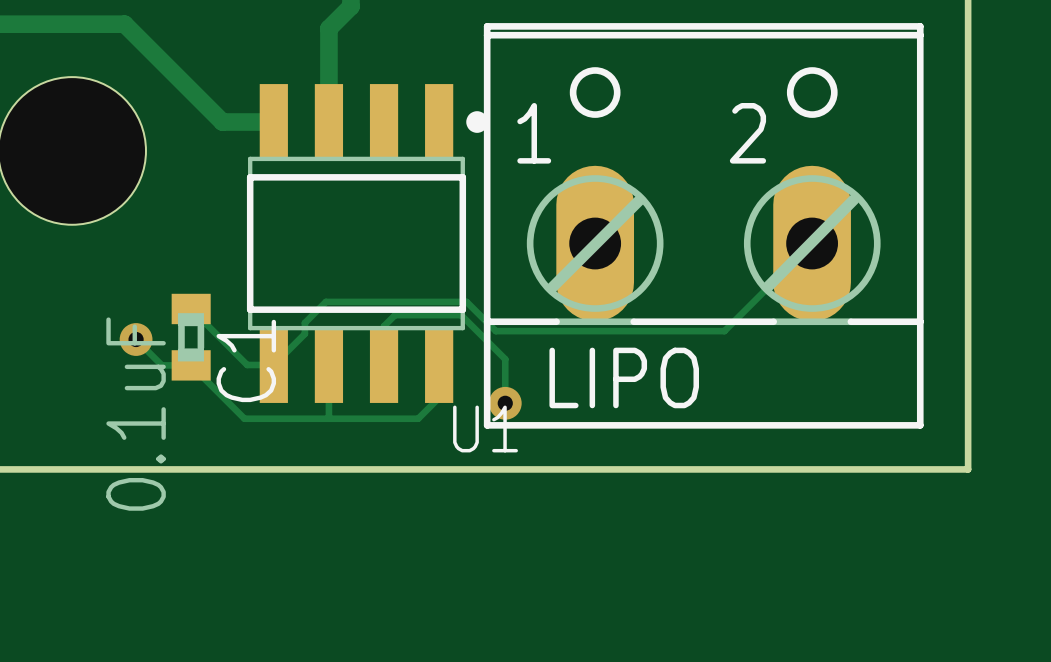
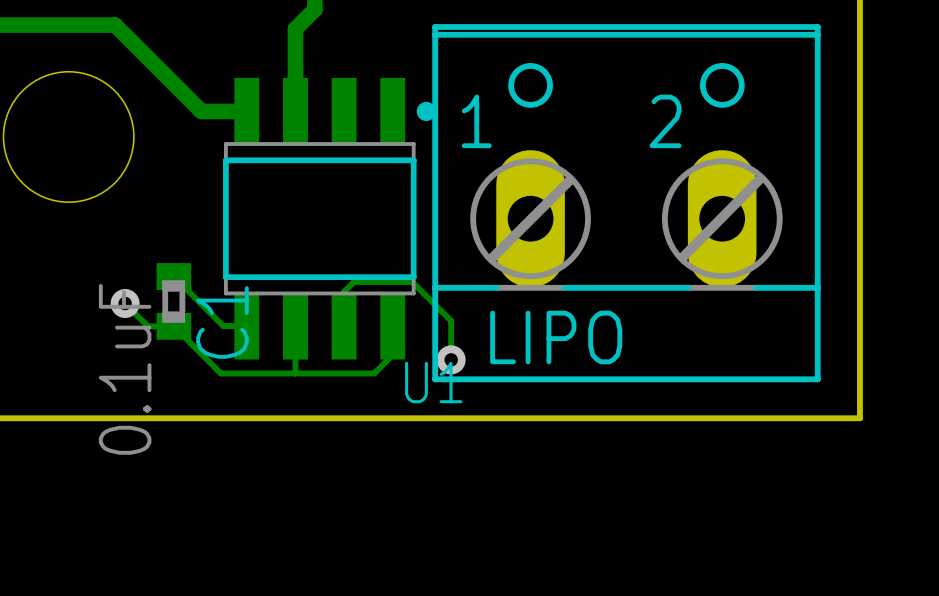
track: (812, 243) (724, 331) (495, 331) (466, 301) (325, 301) (304, 322) (304, 333) (273, 364) -> none

